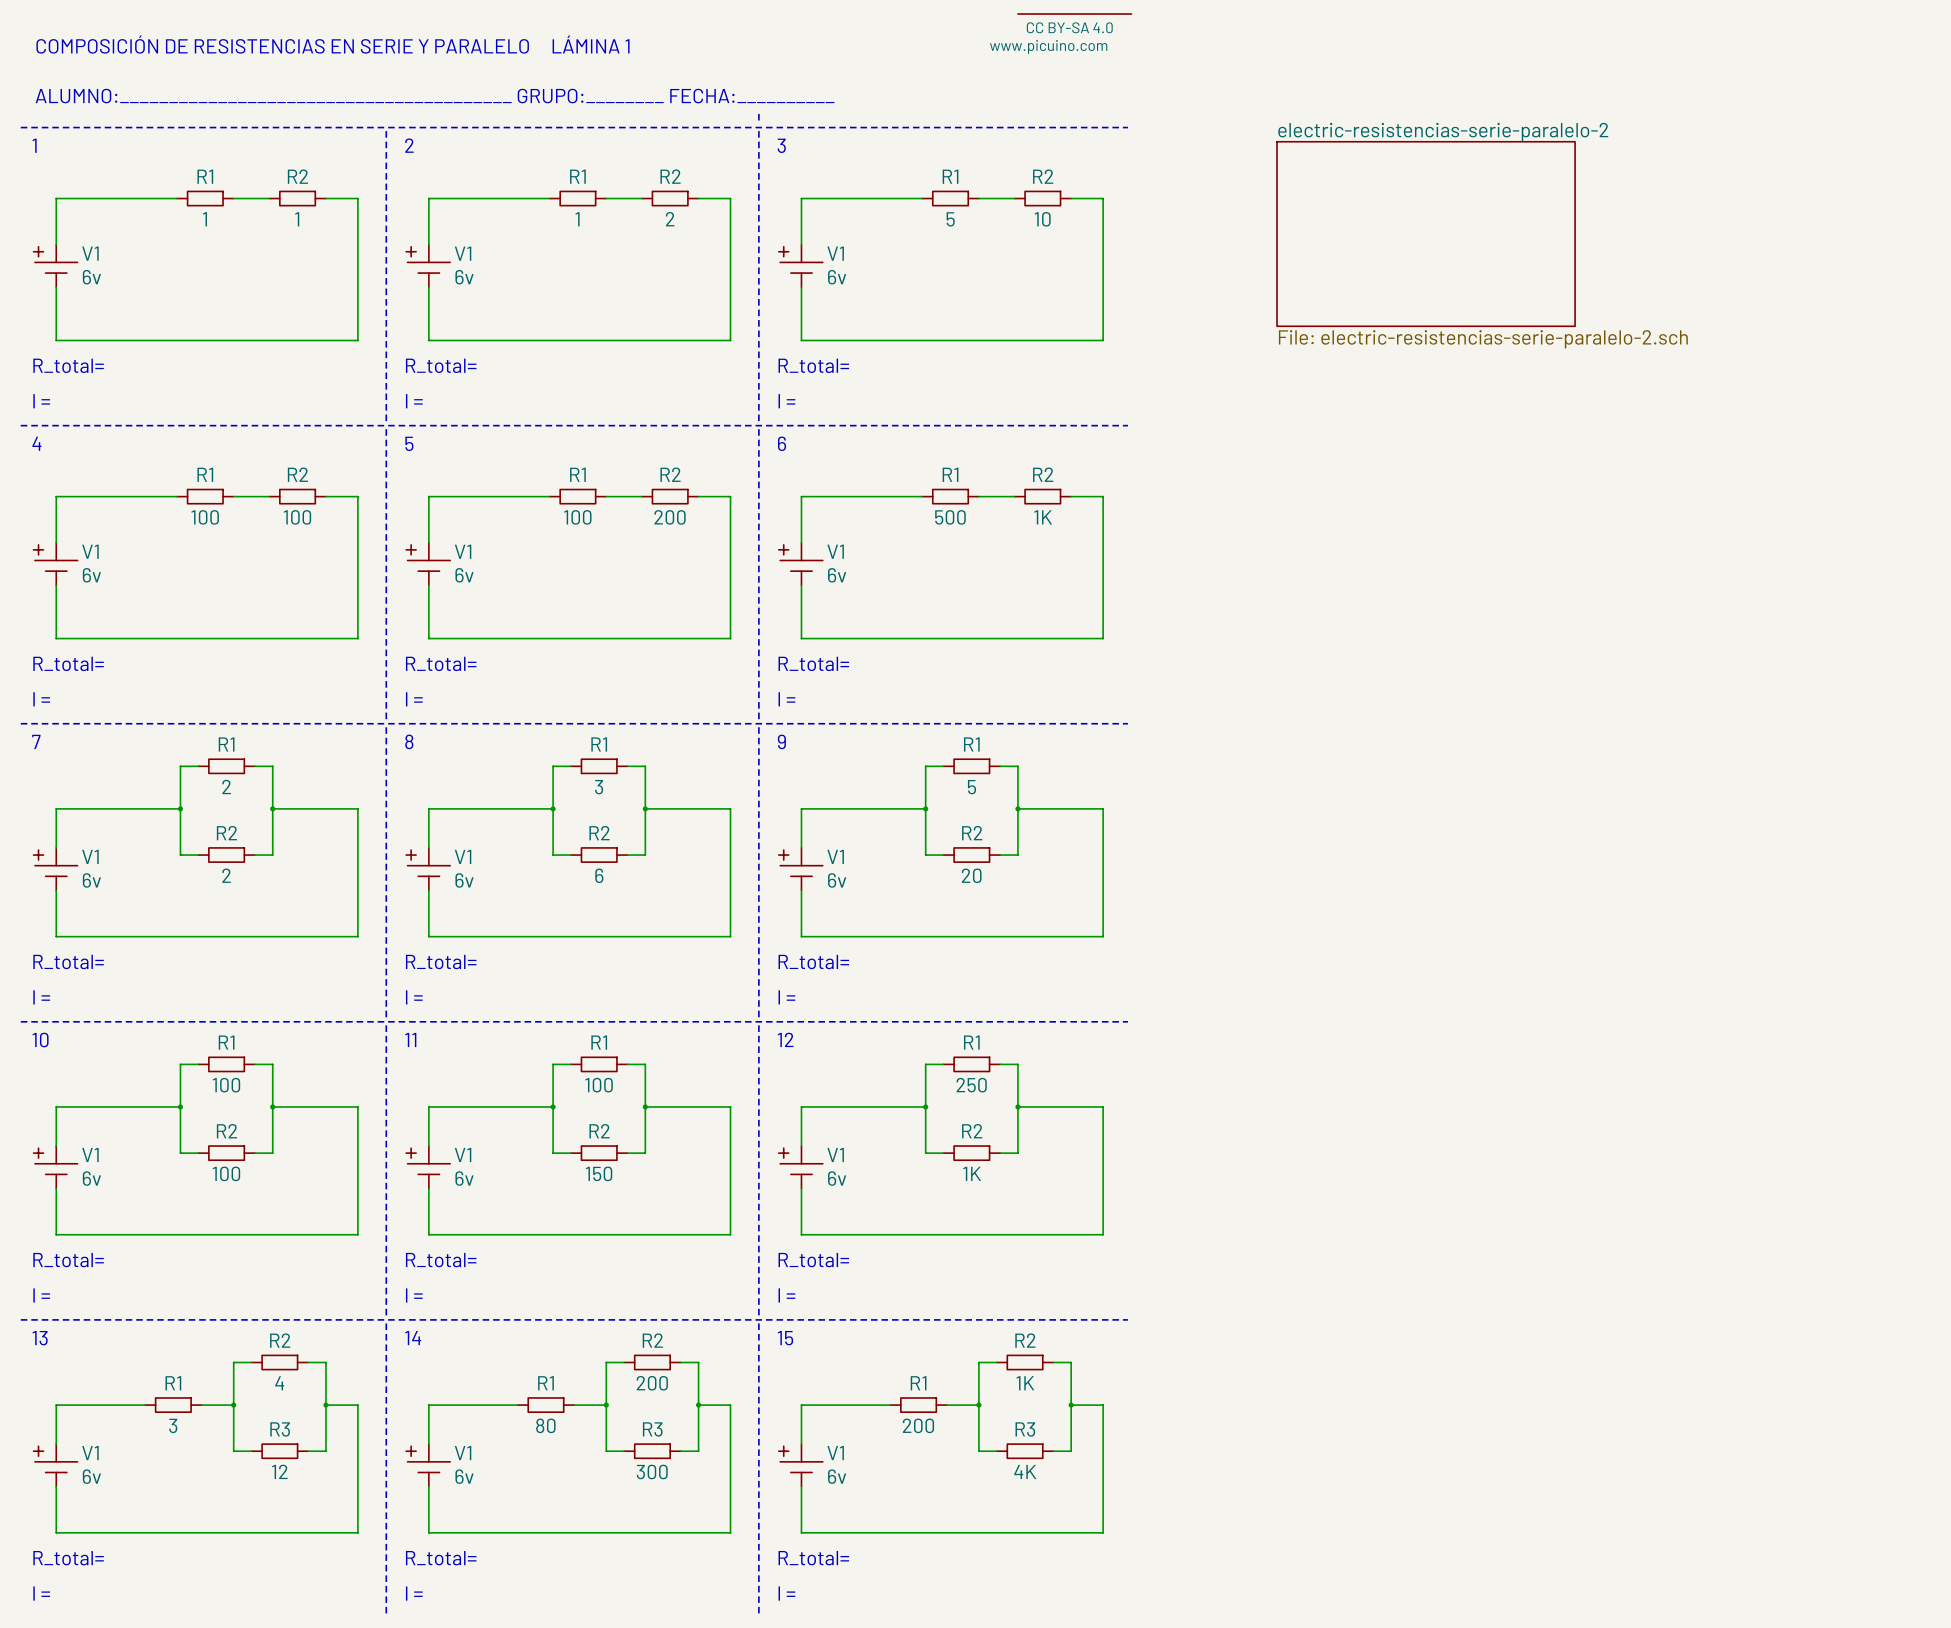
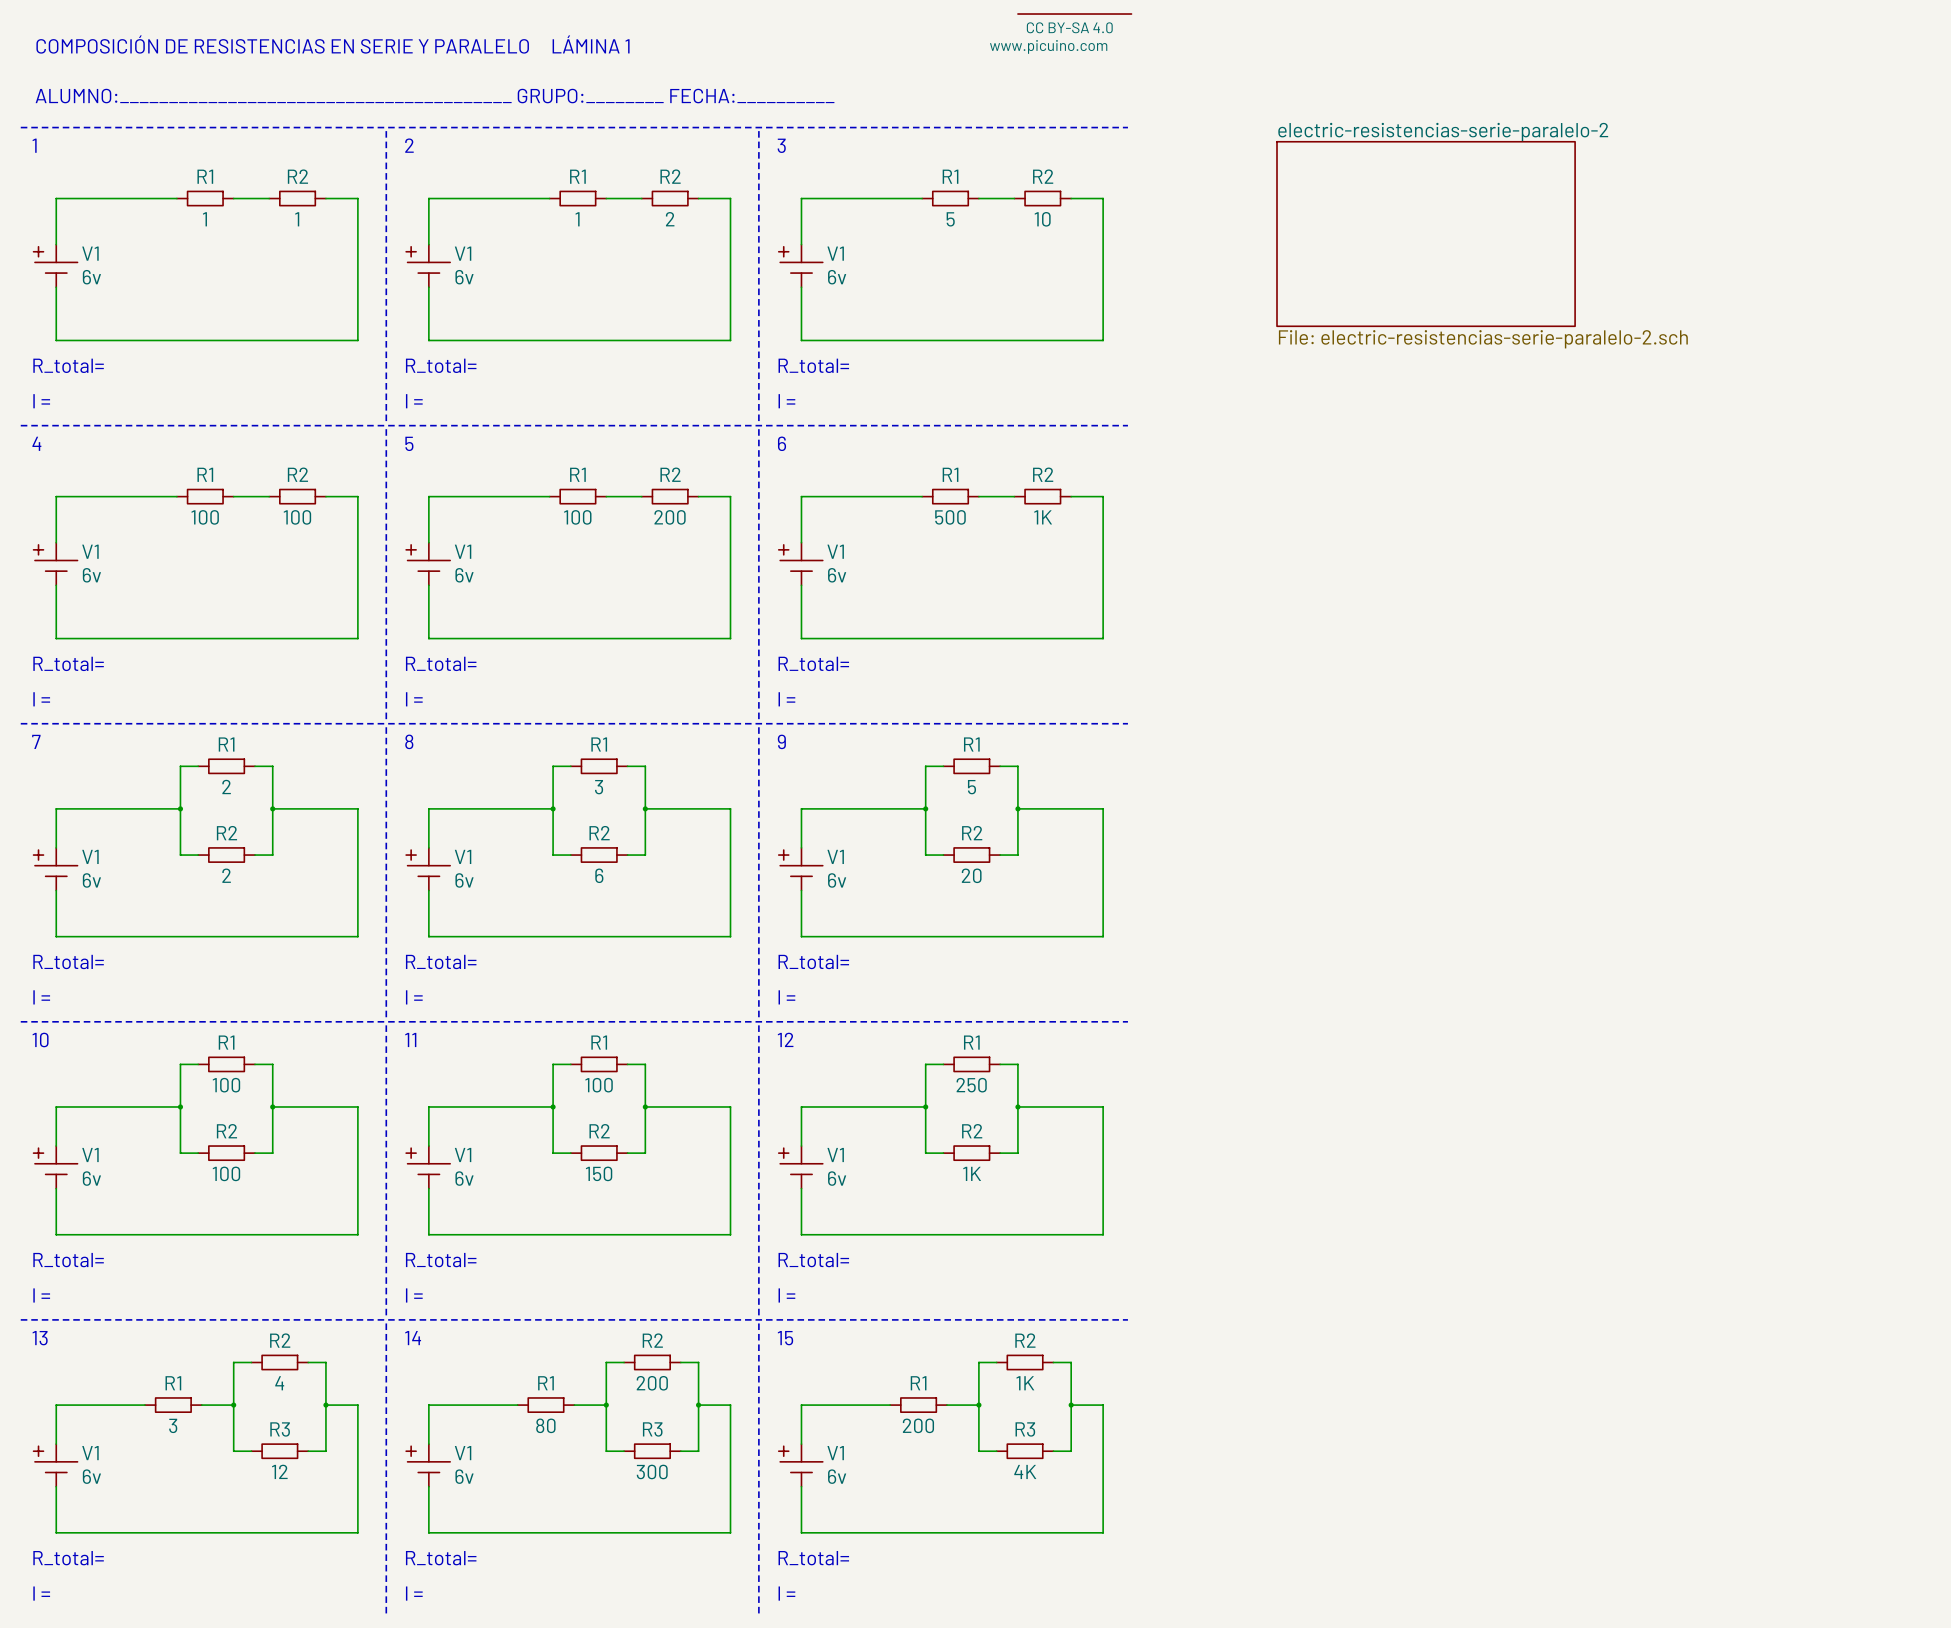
line: (758, 113) (758, 120) -> none

